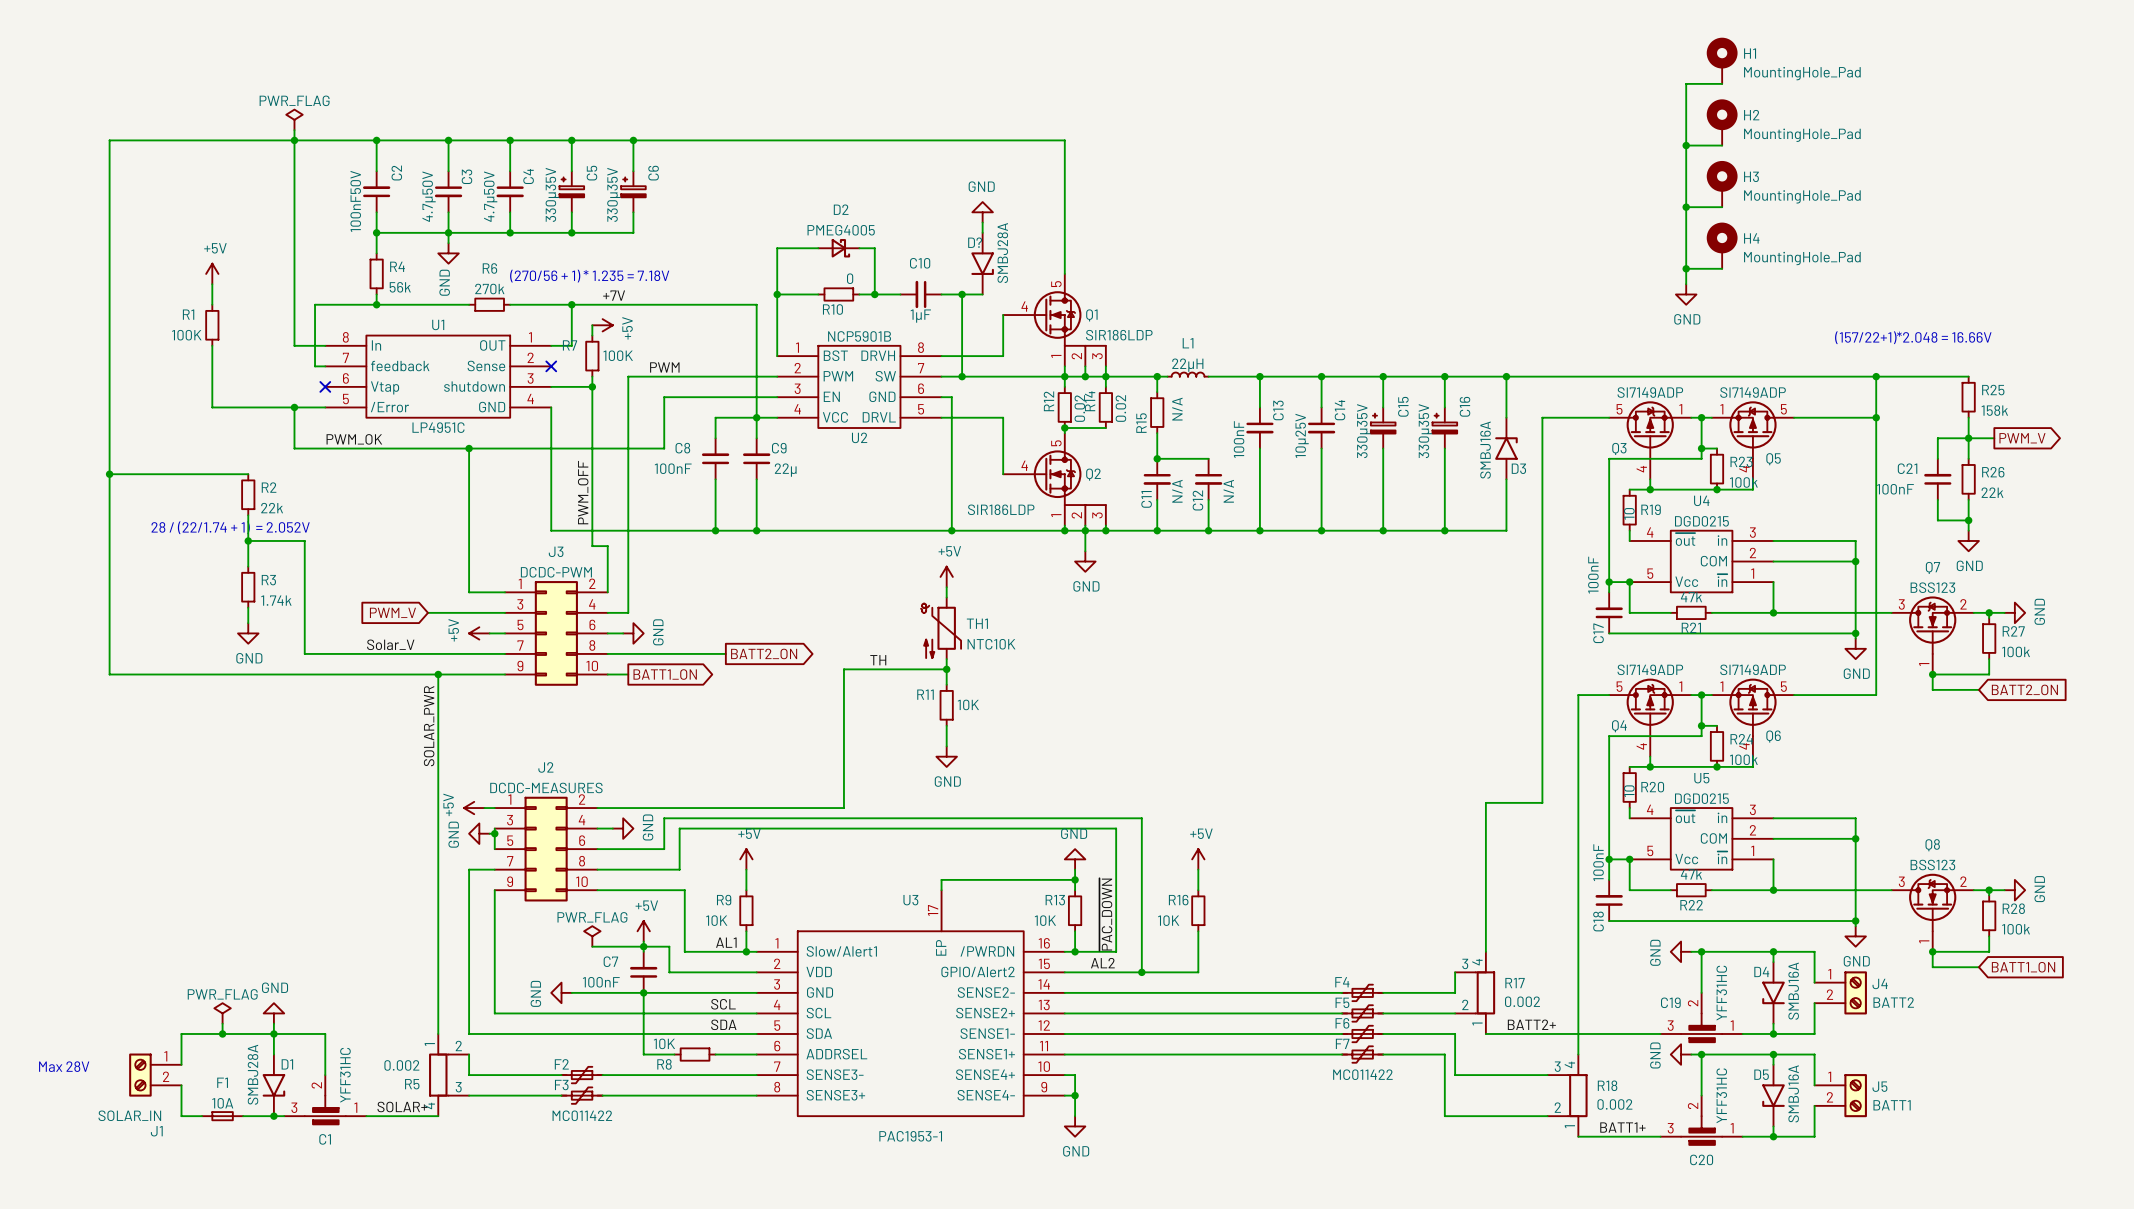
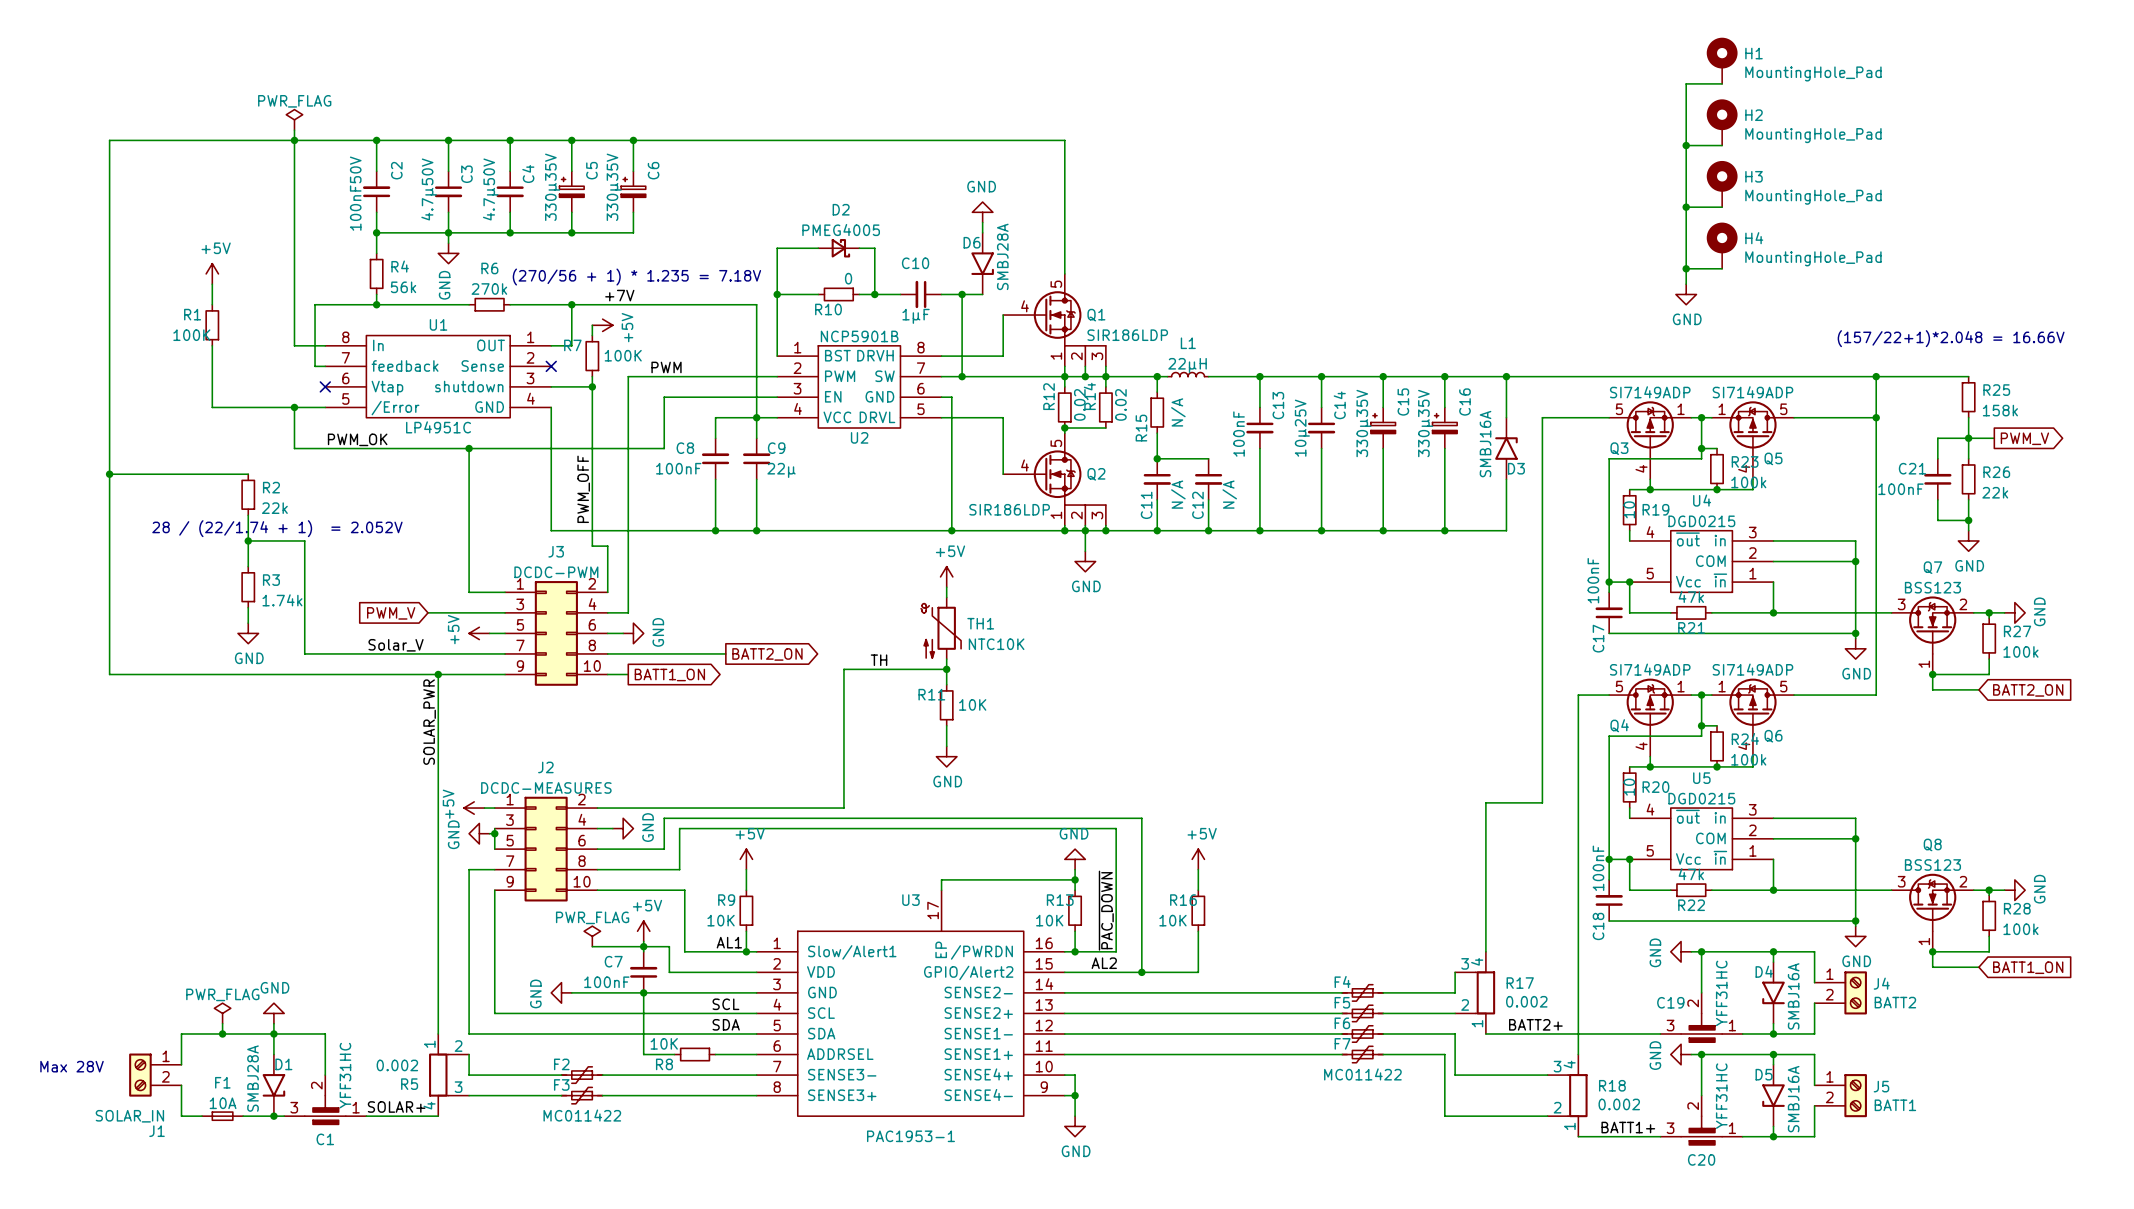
D? name: D? (975, 242) -> D6 (972, 242)

